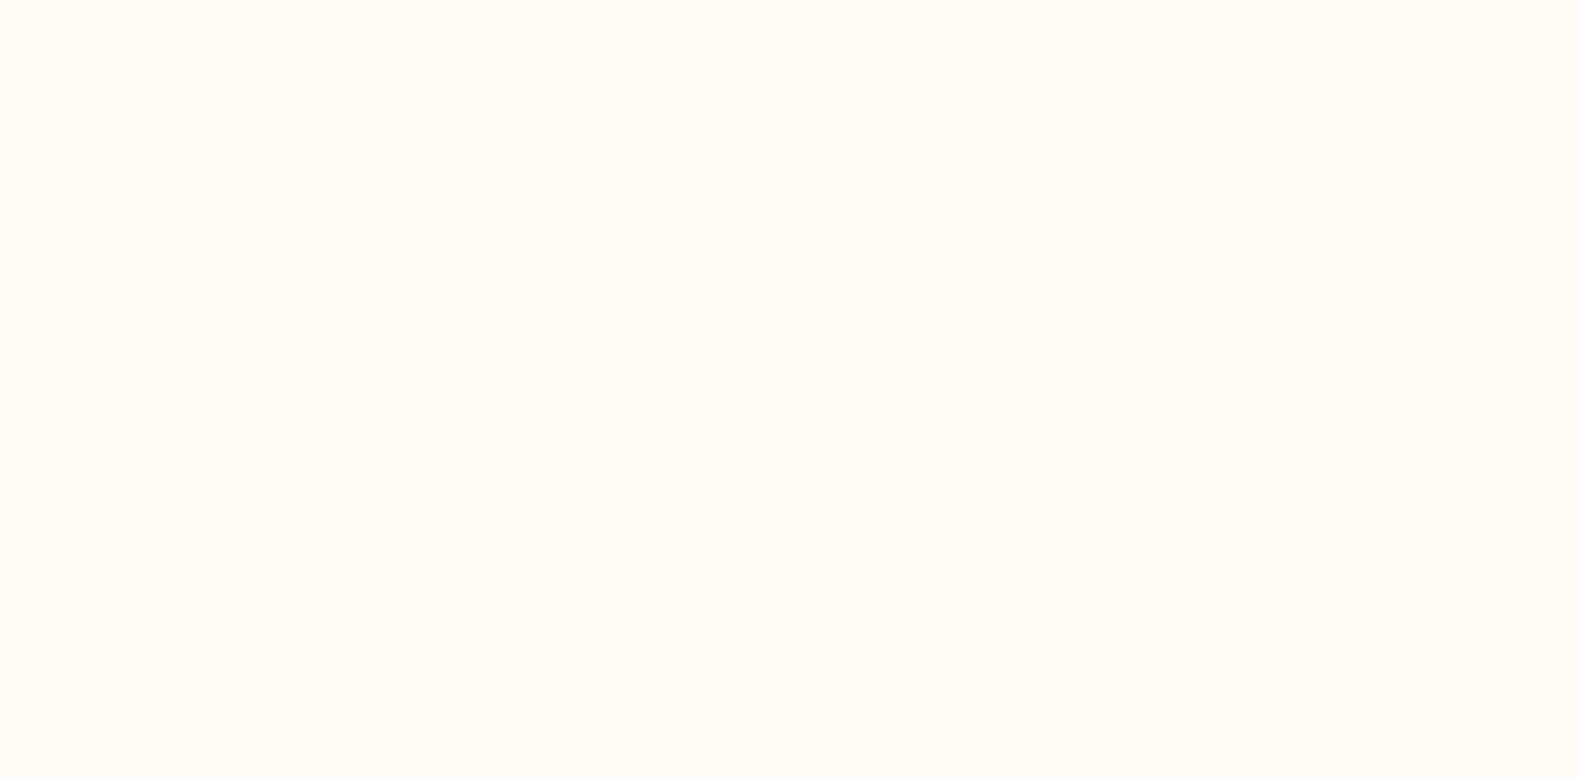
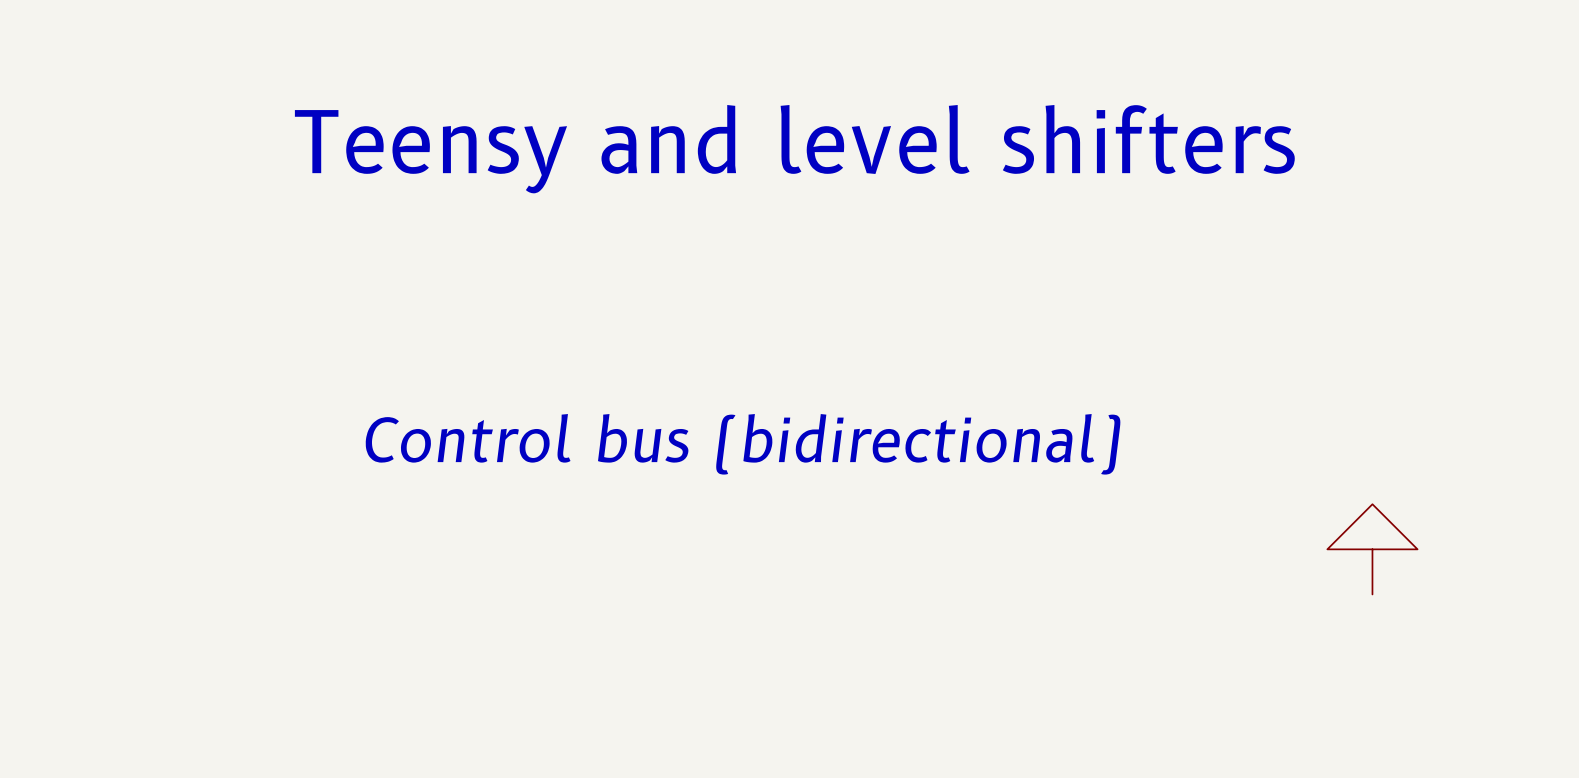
text: none -> Teensy and level shifters (794, 149)
text: none -> Control bus (bidirectional) (742, 444)
power symbol: none -> (1372, 549)

